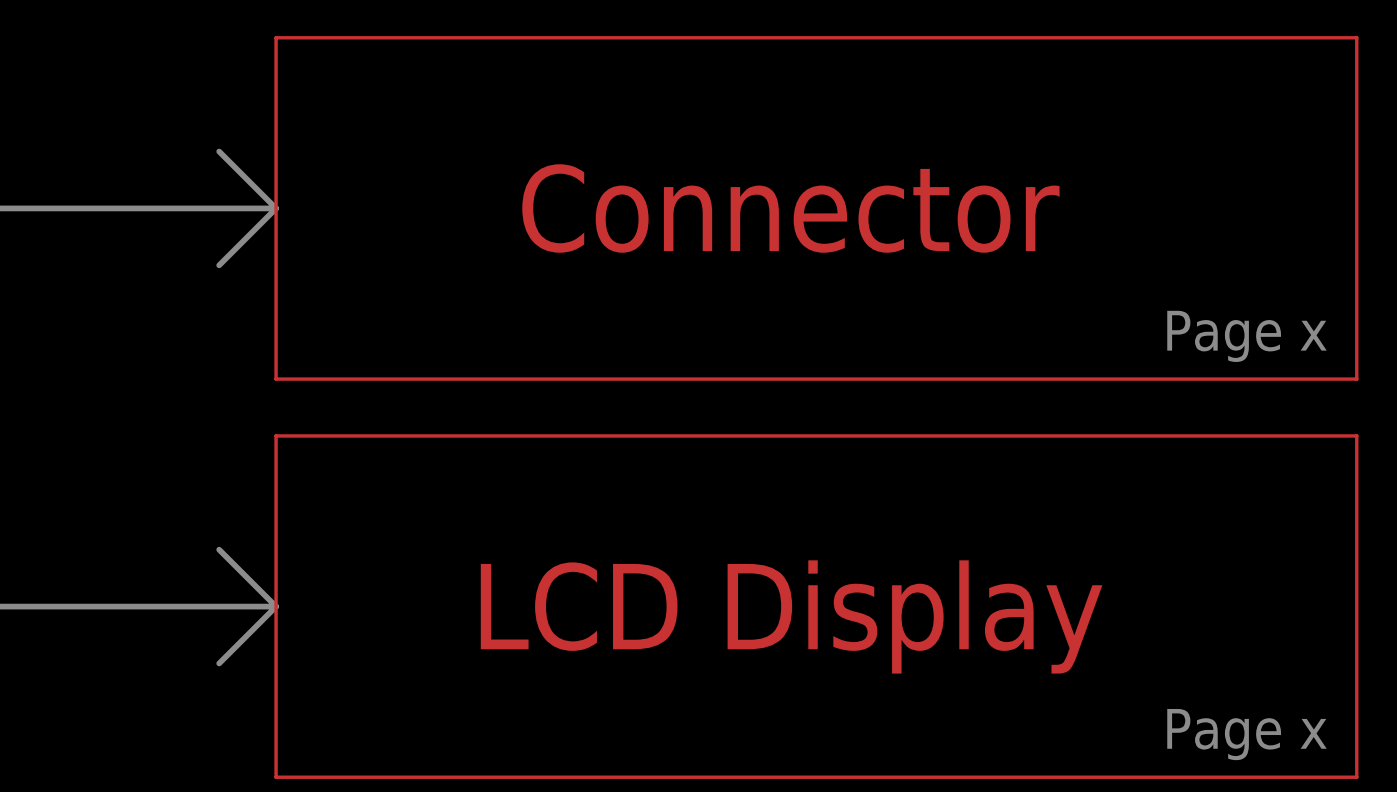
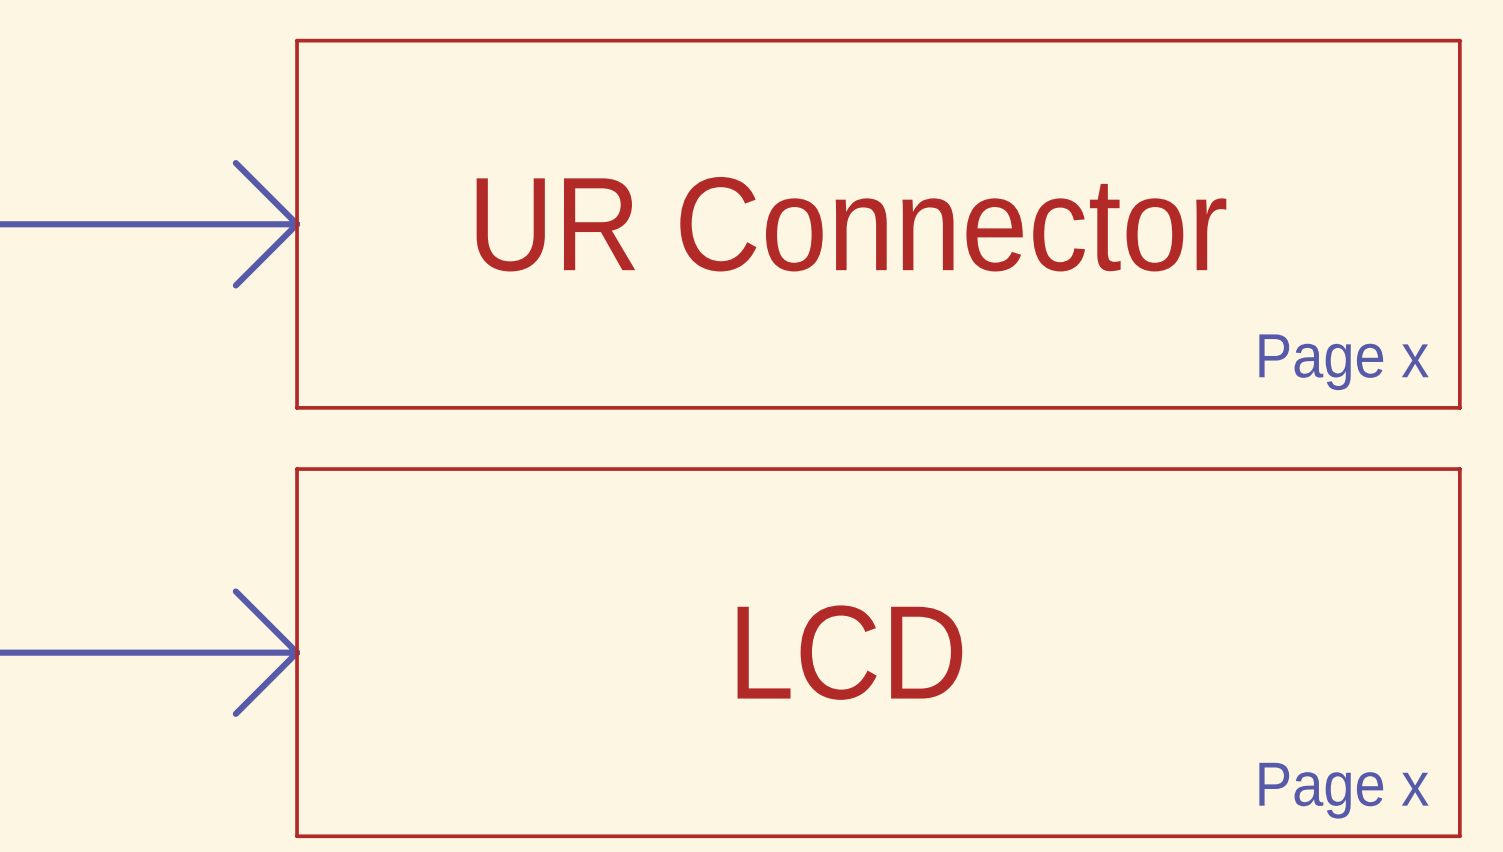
text: Connector (790, 208) -> UR Connector (851, 224)
text: LCD Display (791, 616) -> LCD (849, 652)

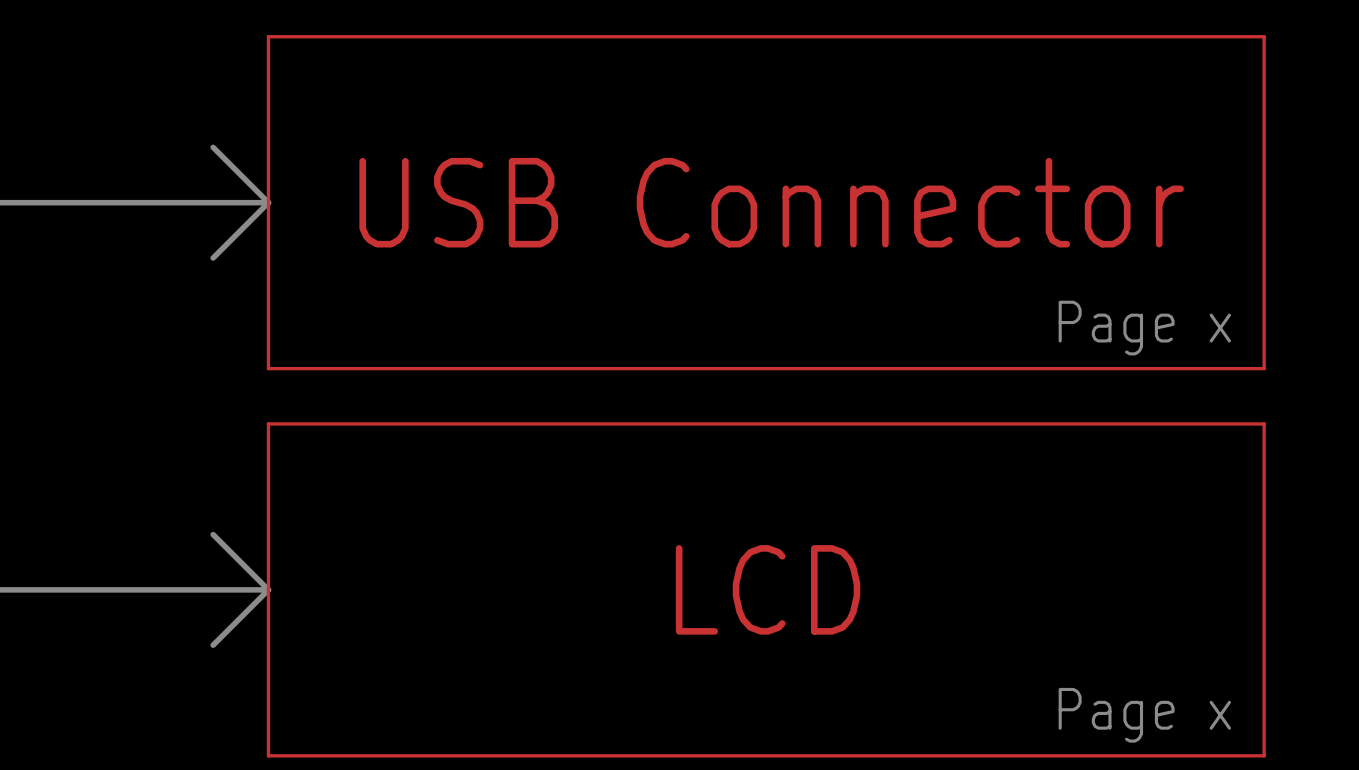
line: (1398, 40) (1459, 40) (1459, 407) (1398, 407) -> (1264, 36) (1264, 368)
text: UR Connector (851, 224) -> USB Connector (771, 202)
text position: Page x (1344, 362) -> Page x (1144, 328)
line: (1398, 469) (1459, 469) (1459, 836) (1398, 836) -> (1264, 423) (1264, 755)
text position: Page x (1344, 790) -> Page x (1144, 715)

